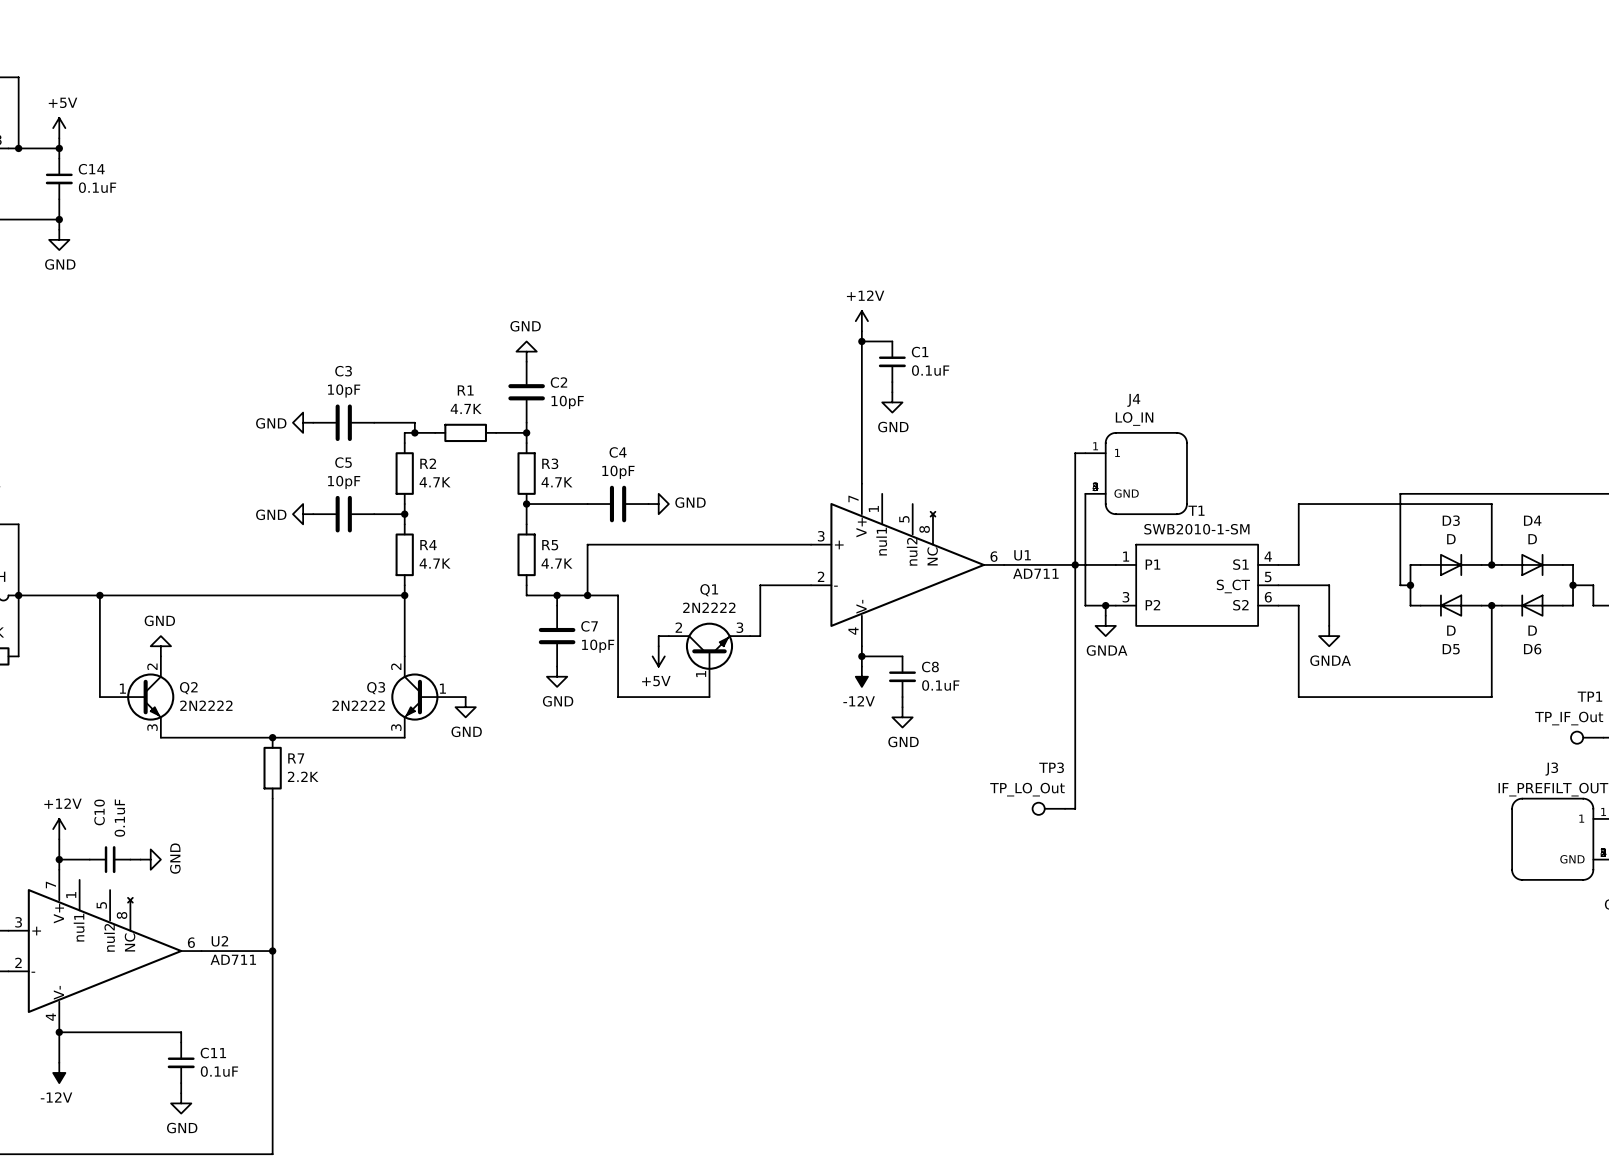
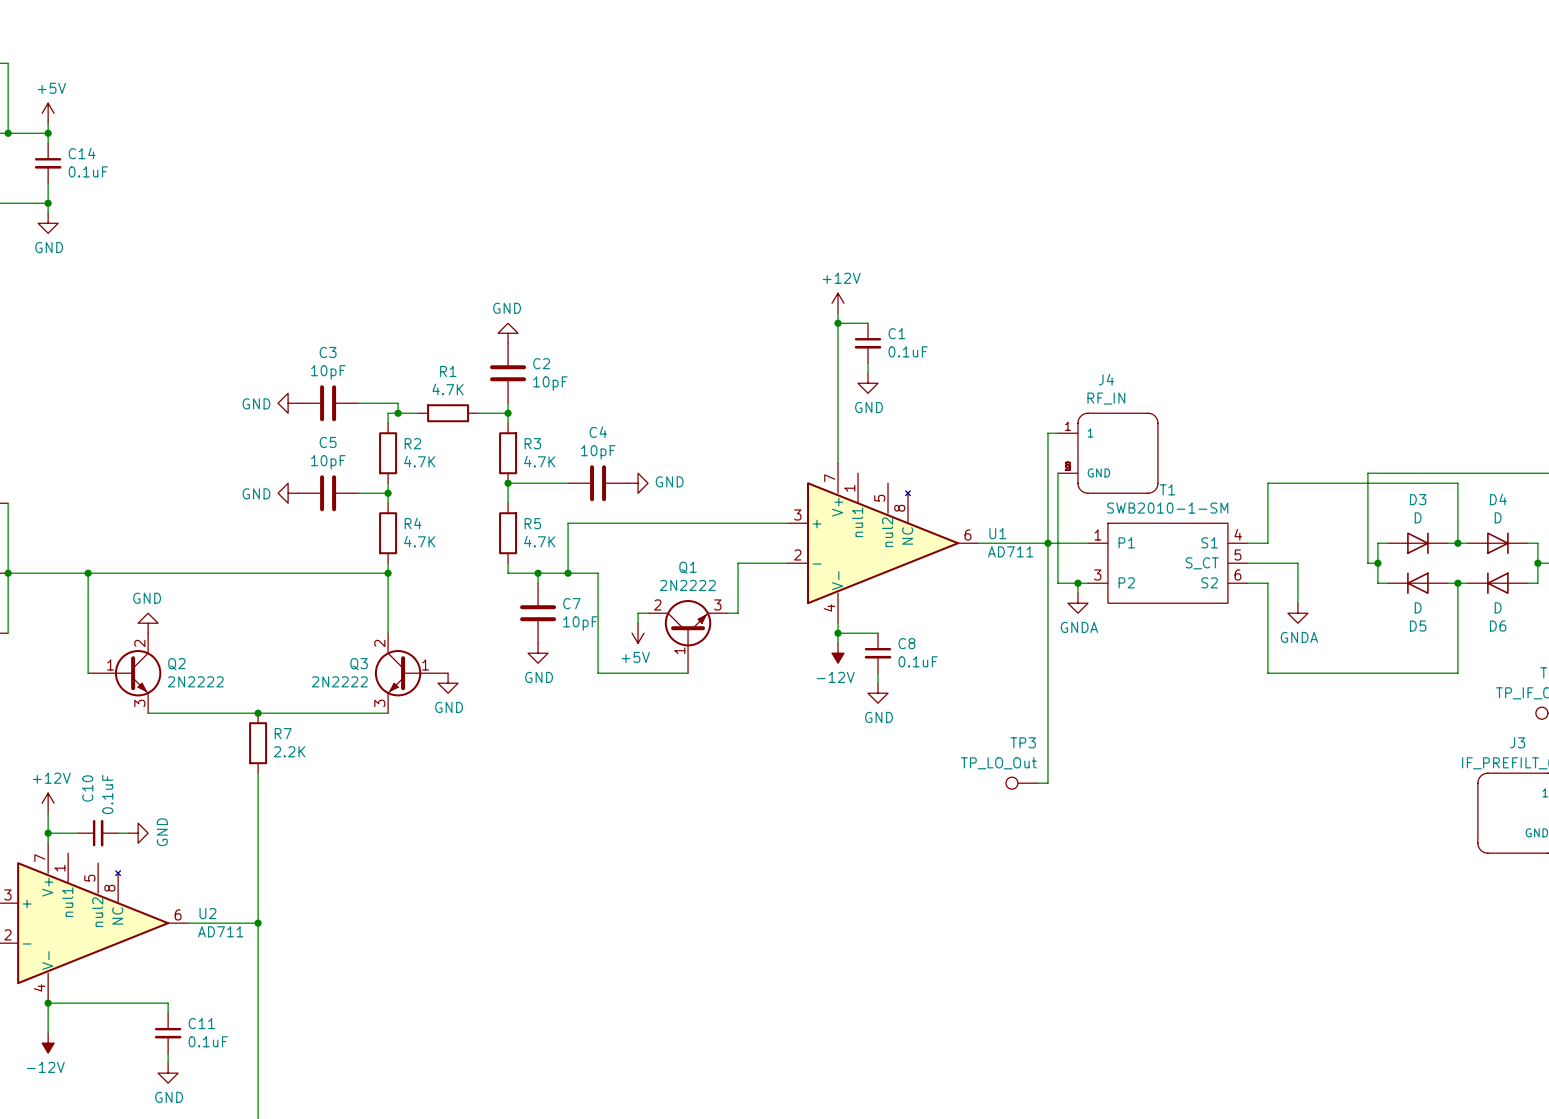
J4 value: LO_IN (1134, 419) -> RF_IN (1106, 398)

